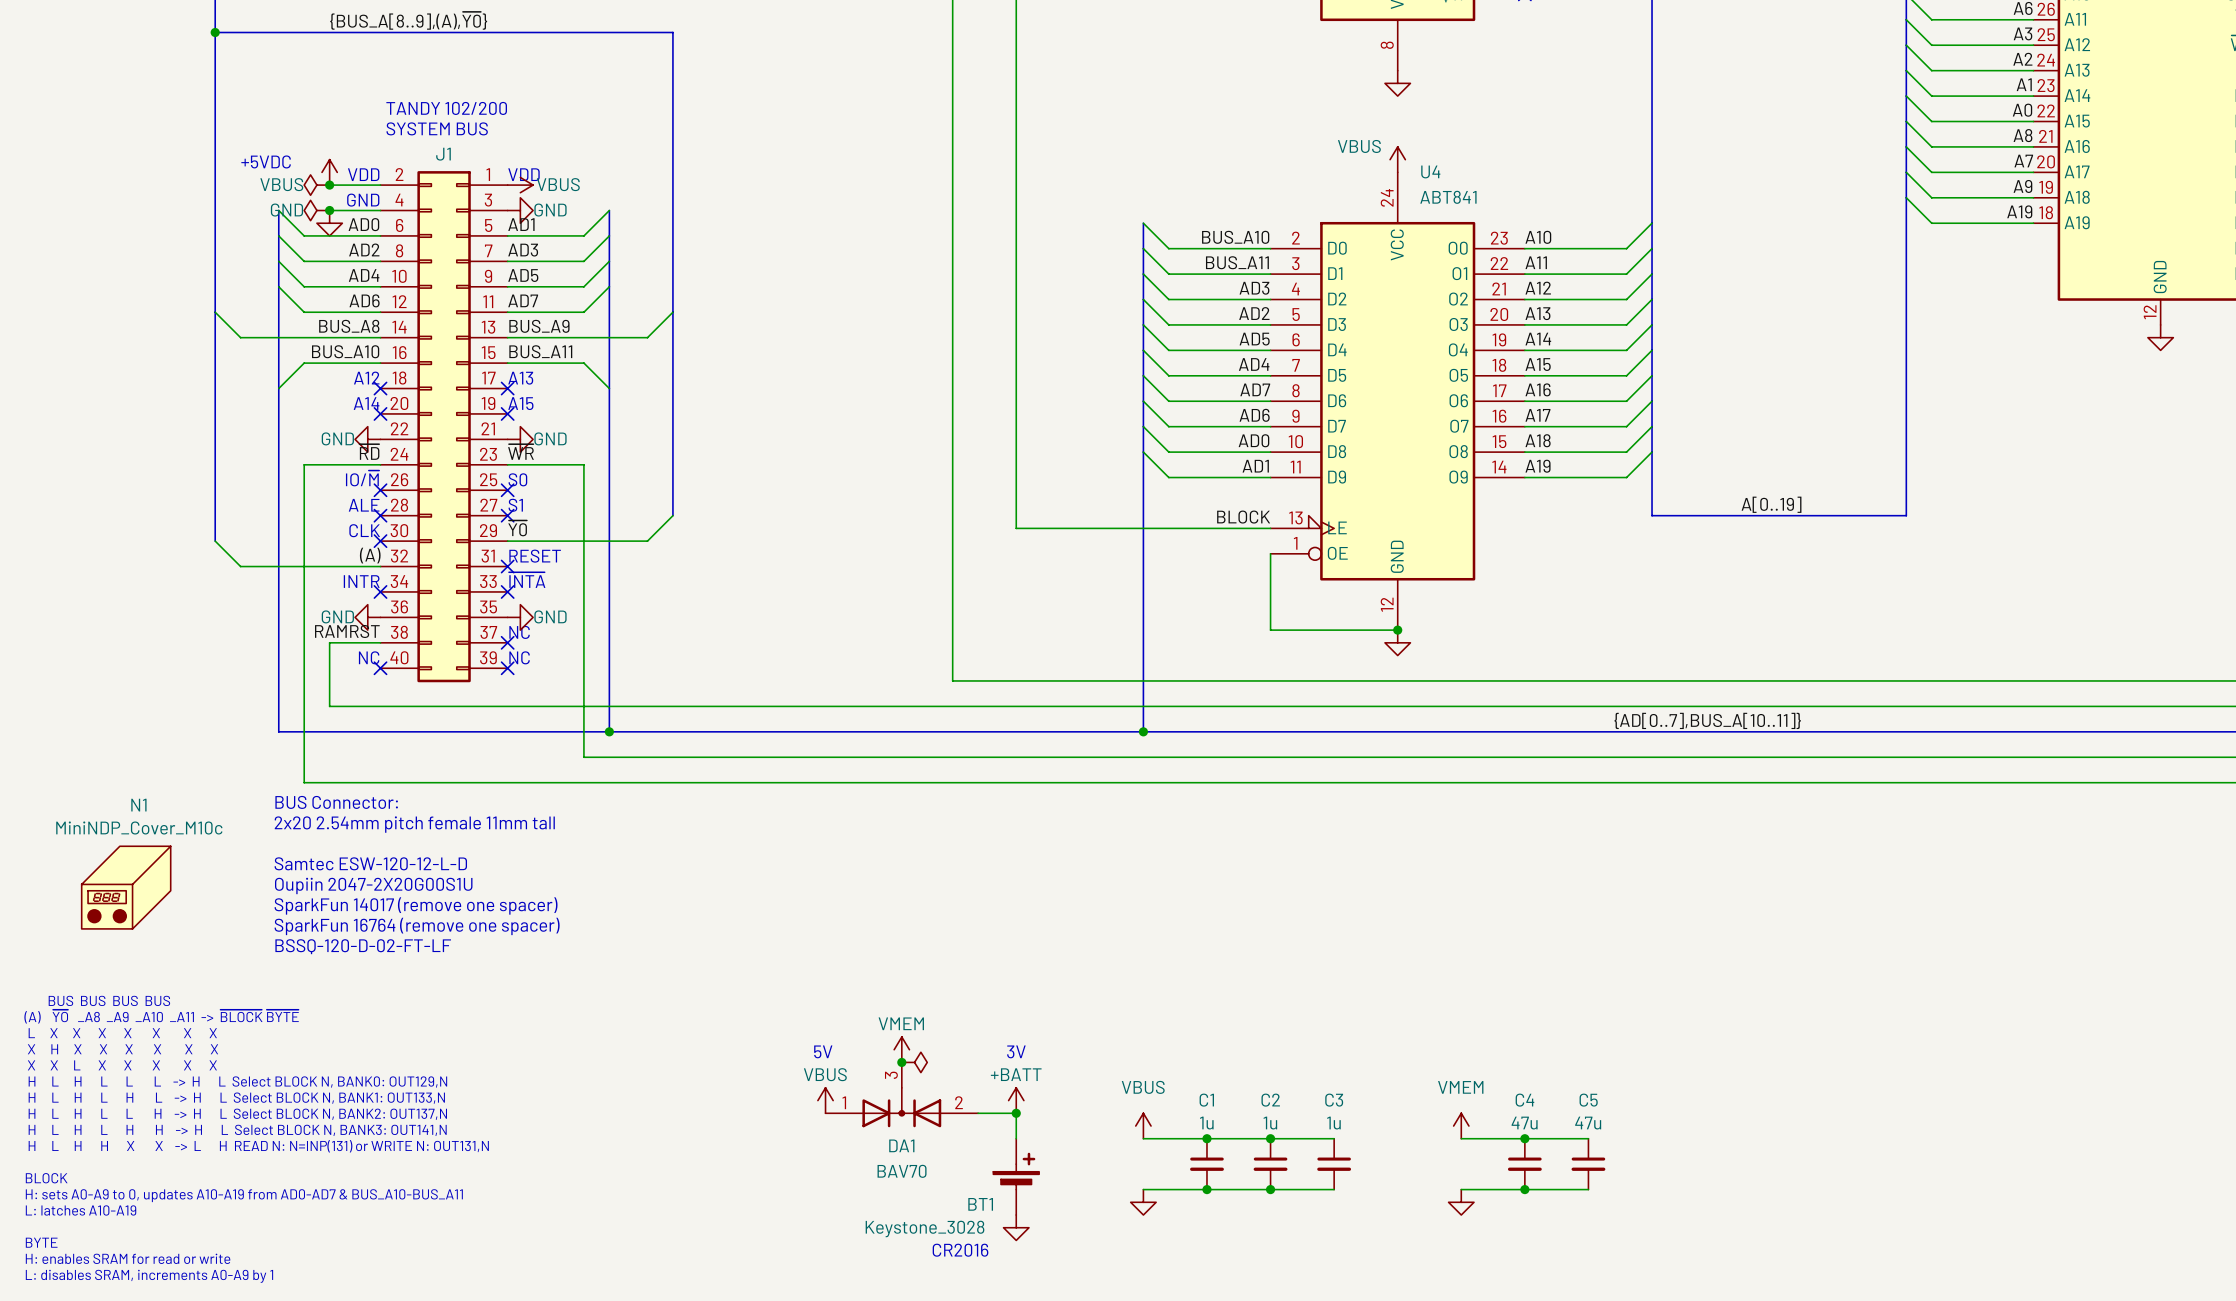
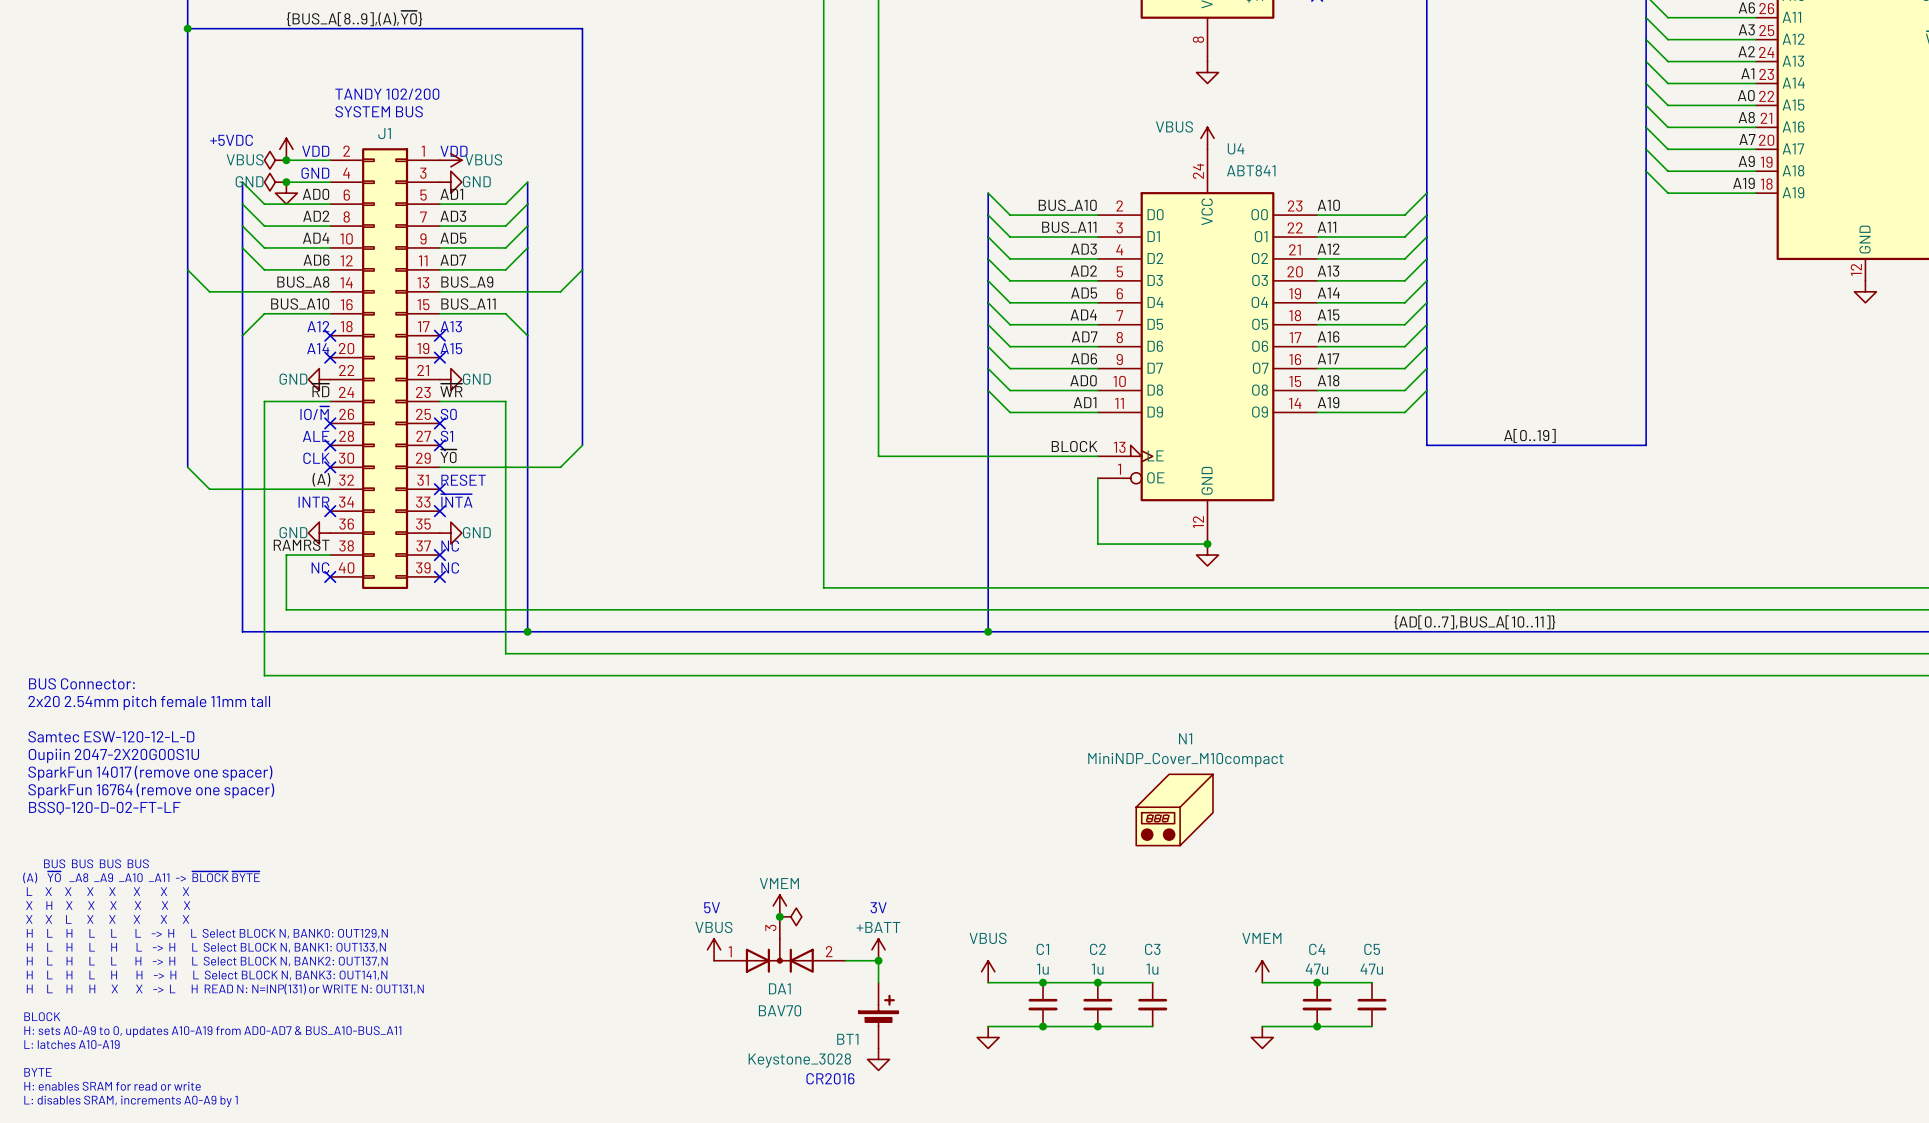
text position: BUS Connector: (336, 802) -> BUS Connector: (81, 683)
text position: 2x20 2.54mm pitch female 11mm tall (414, 824) -> 2x20 2.54mm pitch female 11mm tall (149, 702)
N1 value: MiniNDP_Cover_M10c (139, 827) -> MiniNDP_Cover_M10compact (1185, 760)
text position: Samtec ESW-120-12-L-D (370, 863) -> Samtec ESW-120-12-L-D (111, 736)
text position: Oupiin 2047-2X20G00S1U (373, 885) -> Oupiin 2047-2X20G00S1U (113, 755)
N1 position: (126, 887) -> (1174, 809)
text position: SparkFun 14017 (remove one spacer) (416, 905) -> SparkFun 14017 (remove one spacer) (150, 773)
text position: SparkFun 16764 (remove one spacer) (417, 926) -> SparkFun 16764 (remove one spacer) (151, 790)
text position: BSSQ-120-D-02-FT-LF (363, 946) -> BSSQ-120-D-02-FT-LF (104, 808)

